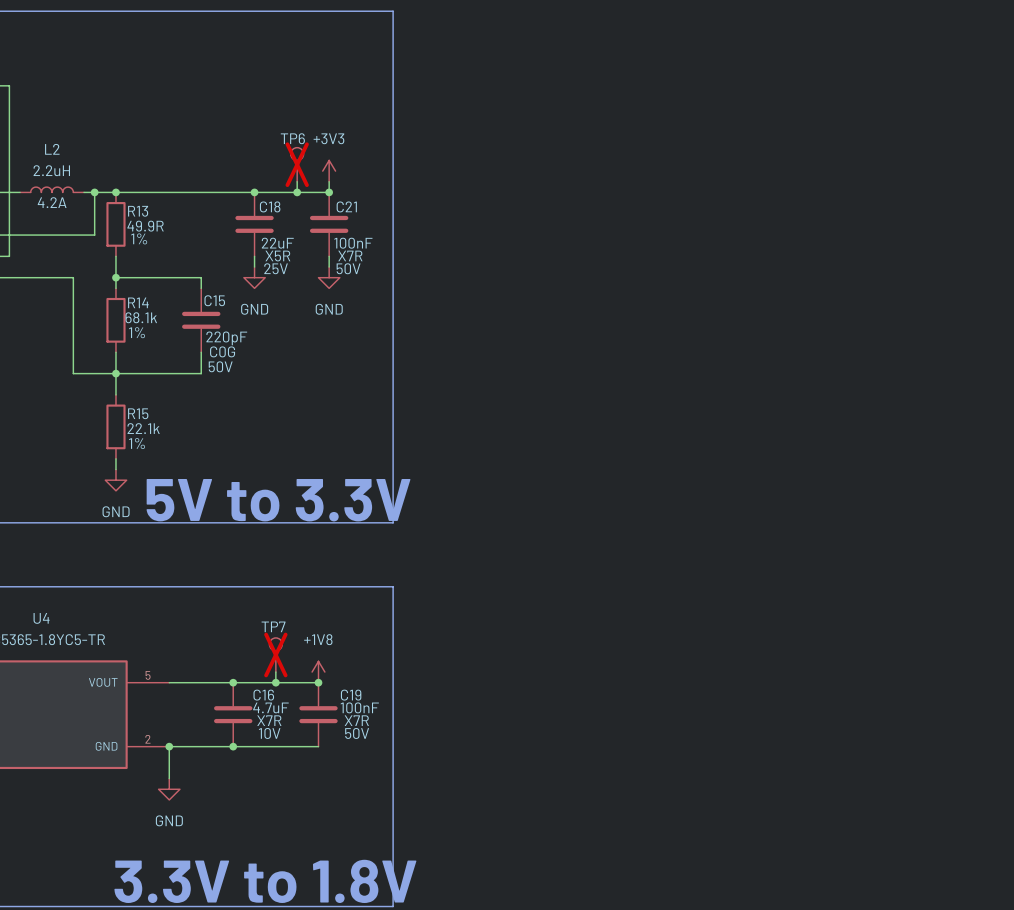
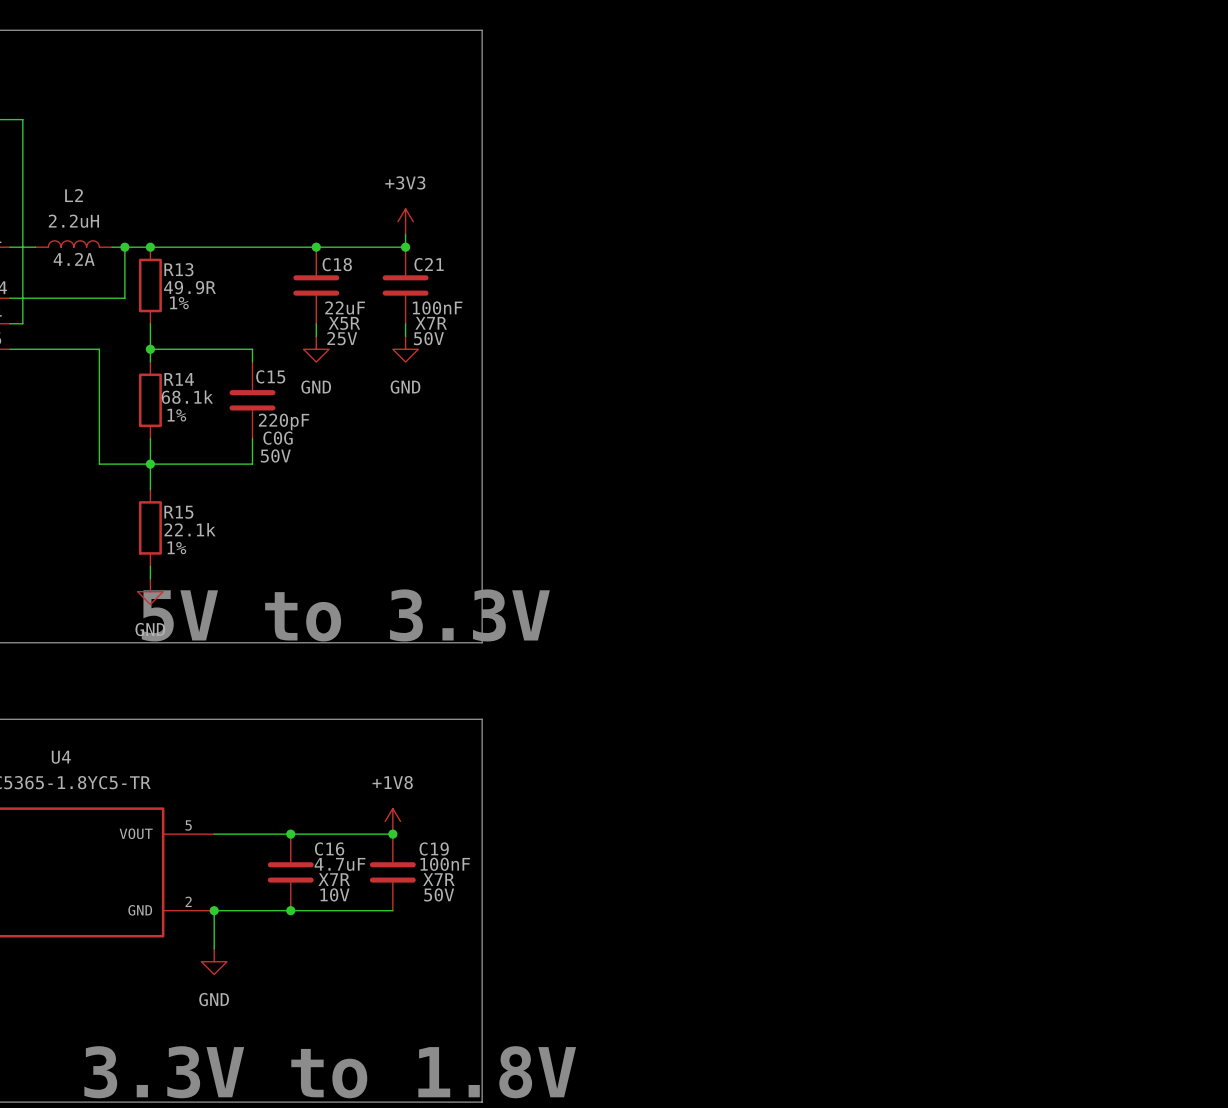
TP6: (297, 164) -> none
wire: (297, 181) (297, 192) -> none
junction: (297, 192) -> none
TP7: (275, 654) -> none
wire: (275, 672) (275, 682) -> none
junction: (275, 682) -> none

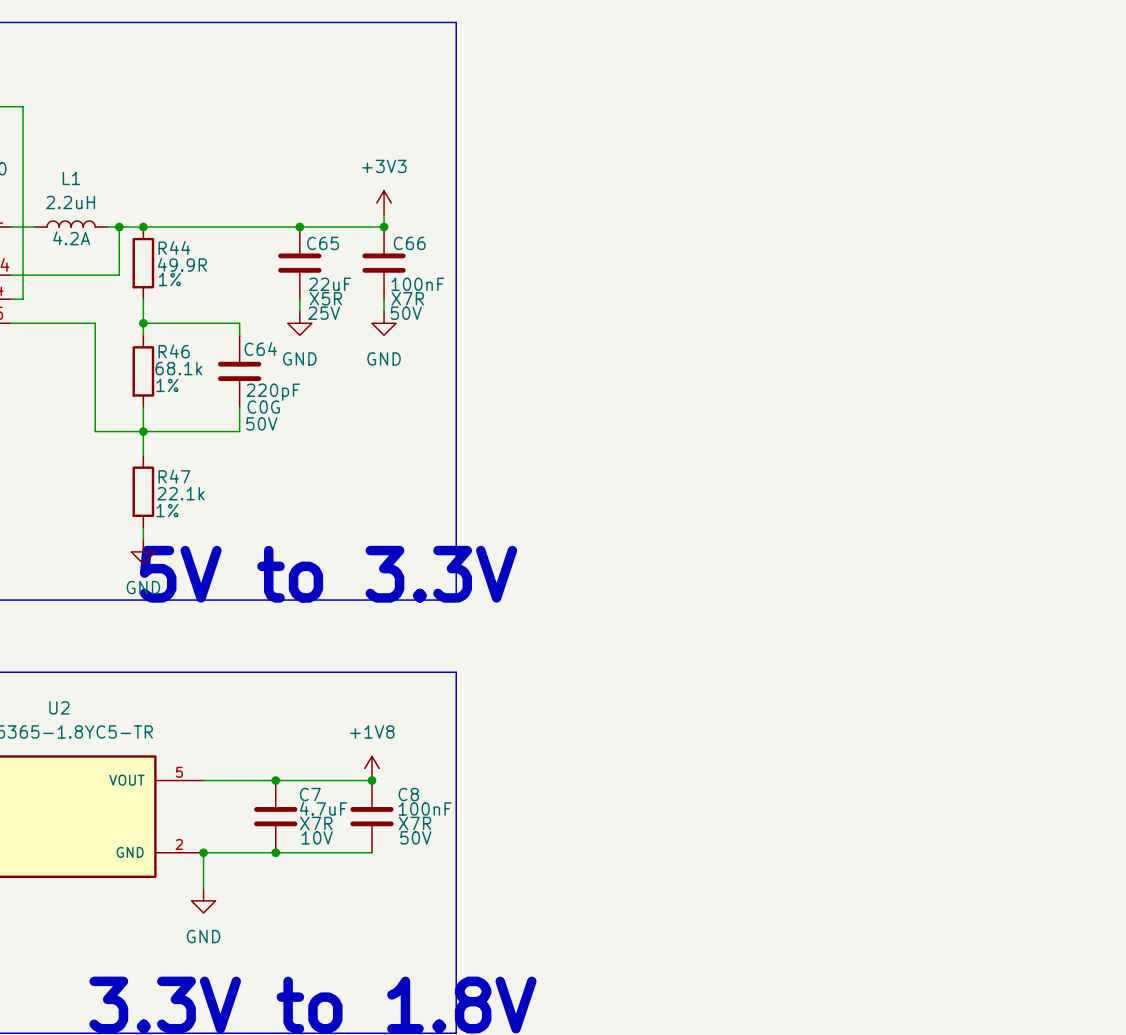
L2 name: L2 (74, 195) -> L1 (71, 178)
C18 name: C18 (337, 264) -> C65 (323, 243)
C21 name: C21 (429, 264) -> C66 (409, 243)
R13 name: R13 (178, 269) -> R44 (174, 247)
C15 name: C15 (270, 376) -> C64 (260, 349)
R14 name: R14 (179, 379) -> R46 (174, 351)
R15 name: R15 (178, 512) -> R47 (174, 476)
U4 name: U4 (61, 757) -> U2 (59, 707)
C16 name: C16 (329, 848) -> C7 (310, 794)
C19 name: C19 (434, 848) -> C8 (408, 794)

